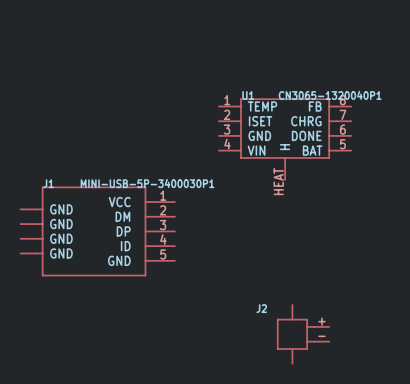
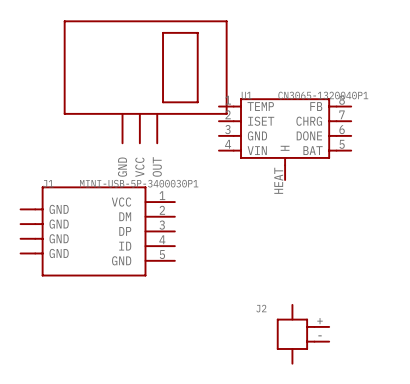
part: none -> (145, 81)

